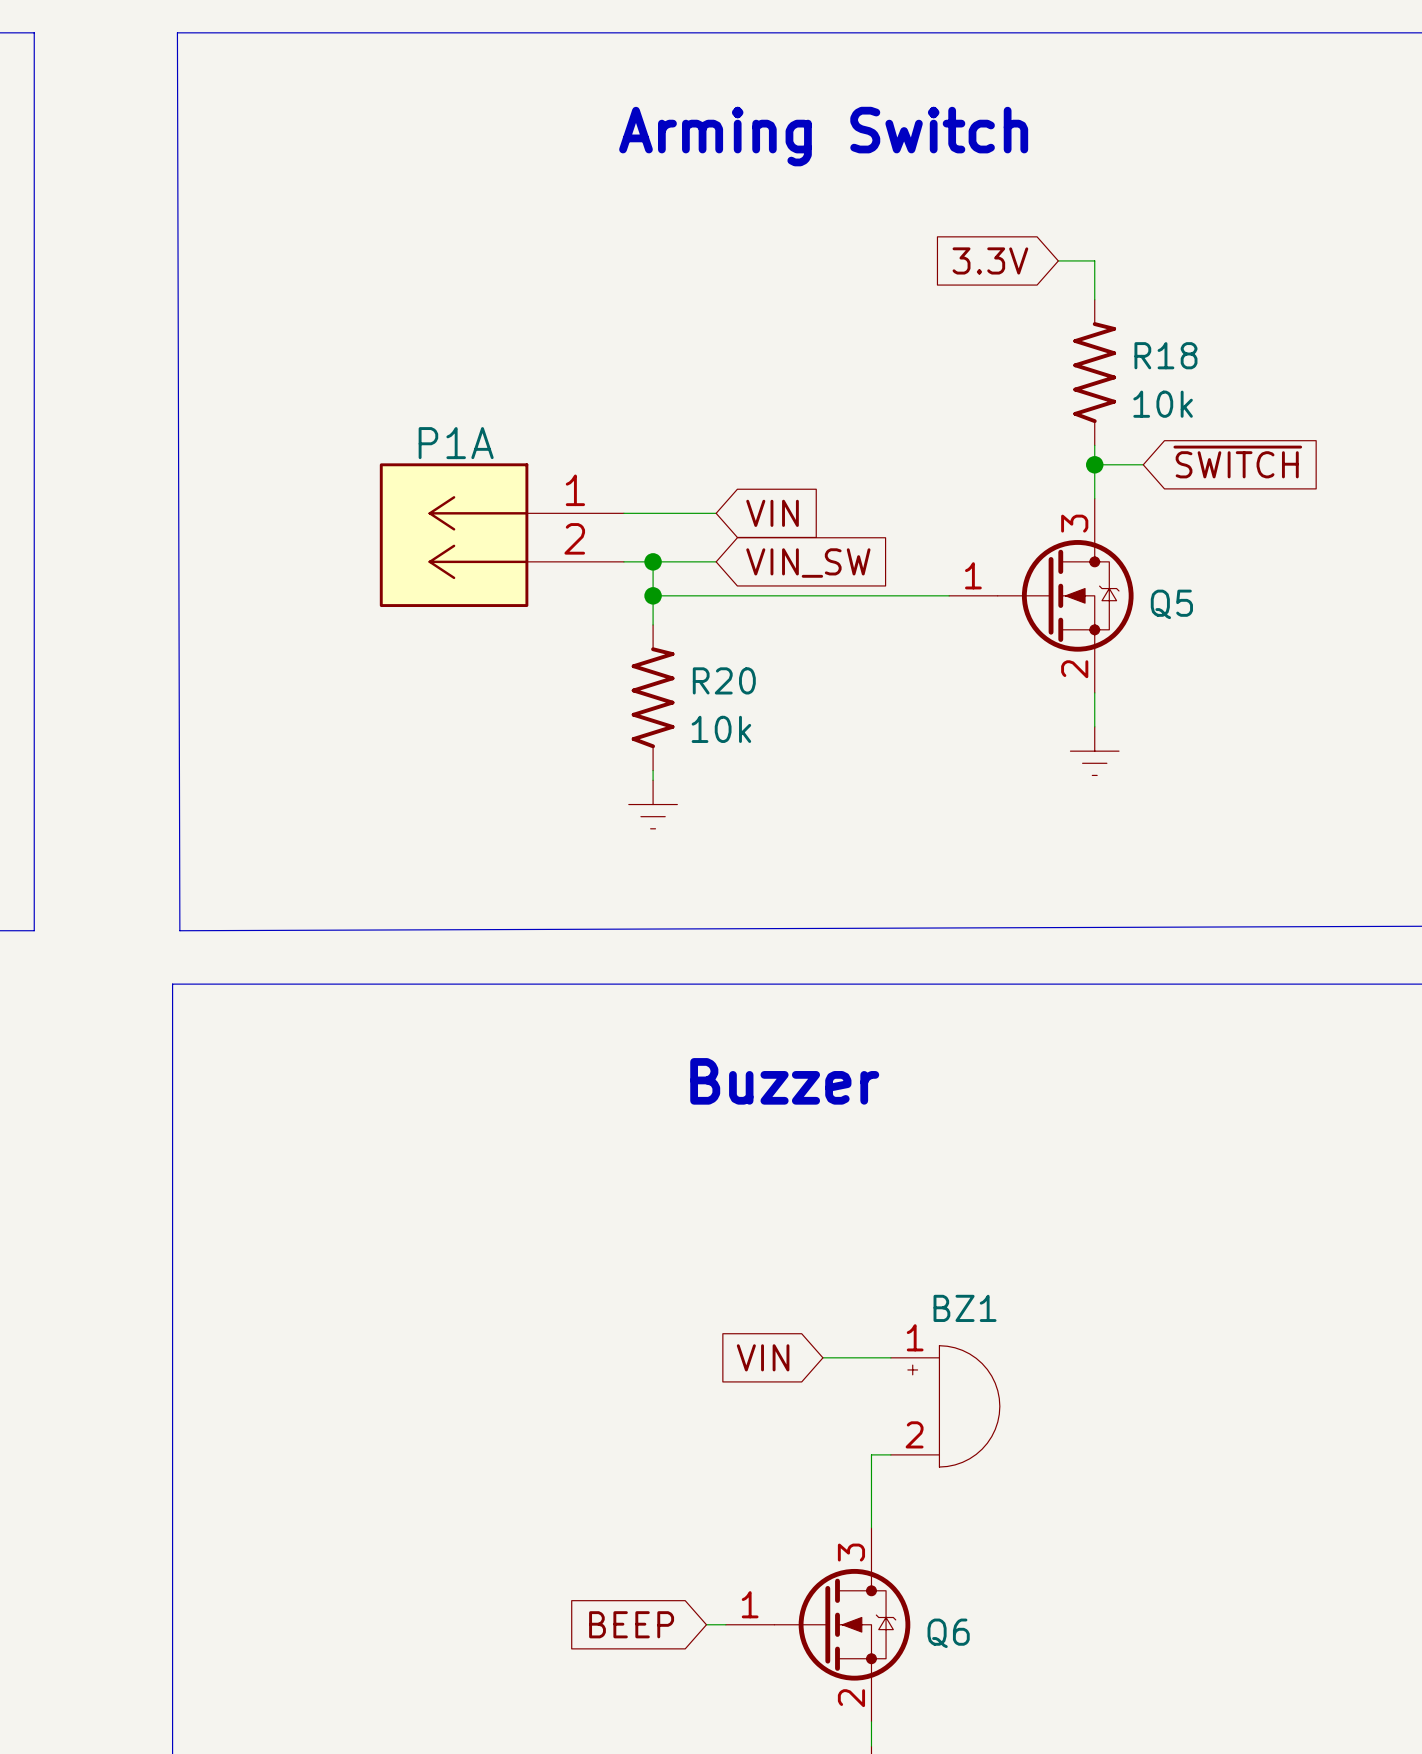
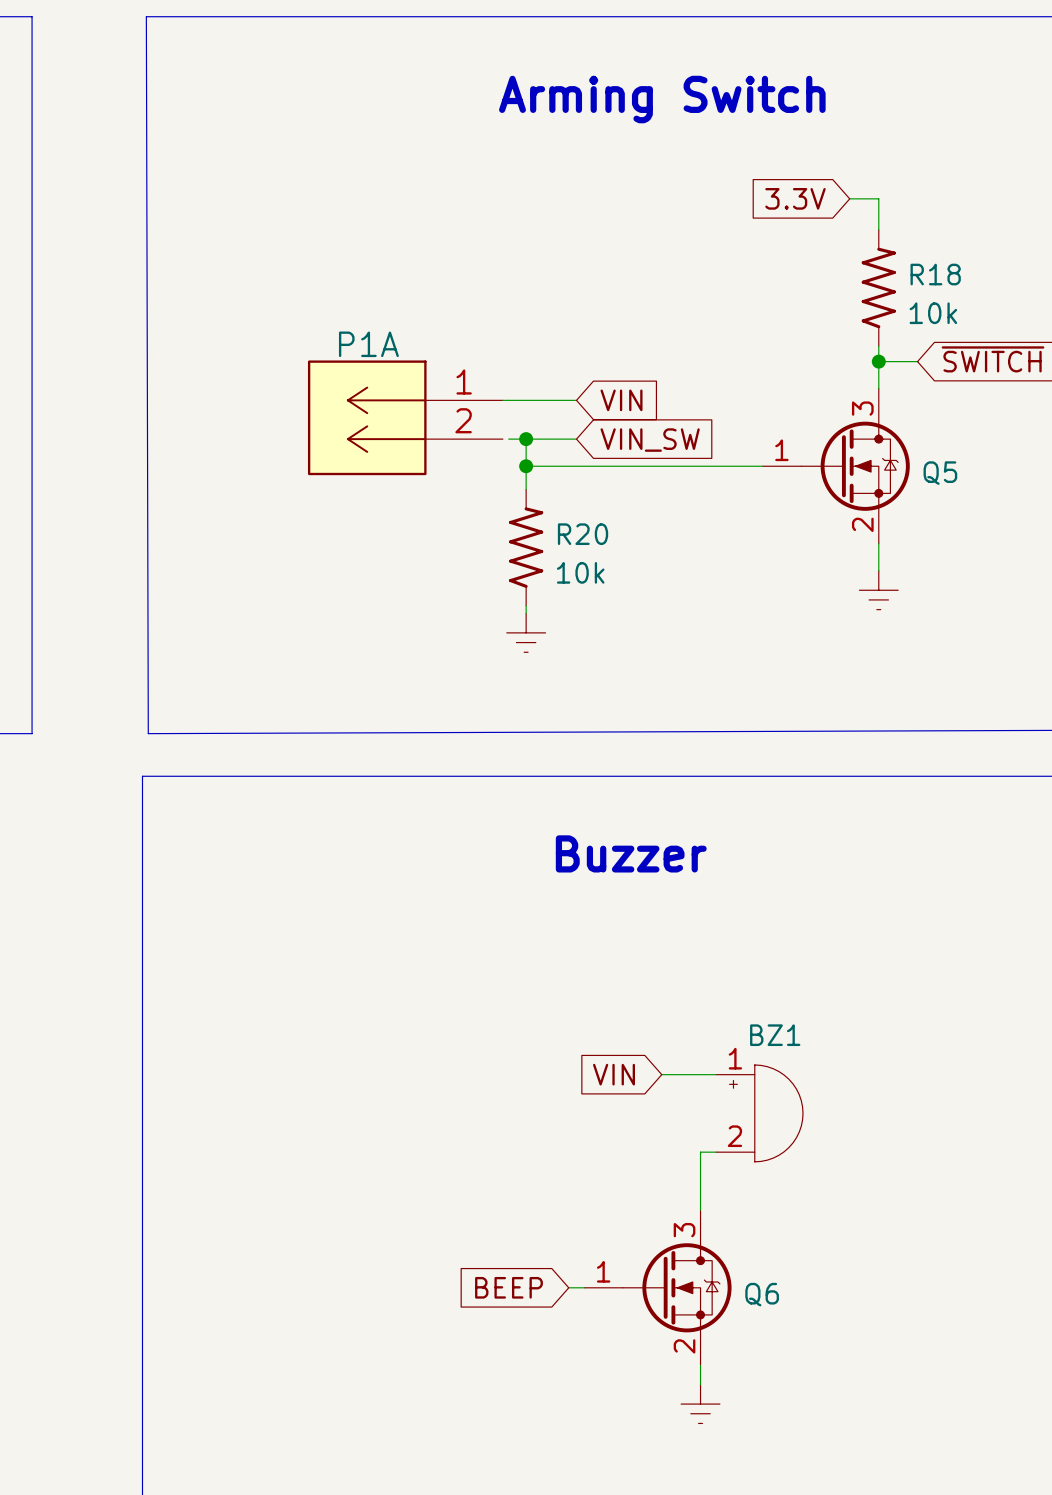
wire: (623, 561) (631, 561) -> none

